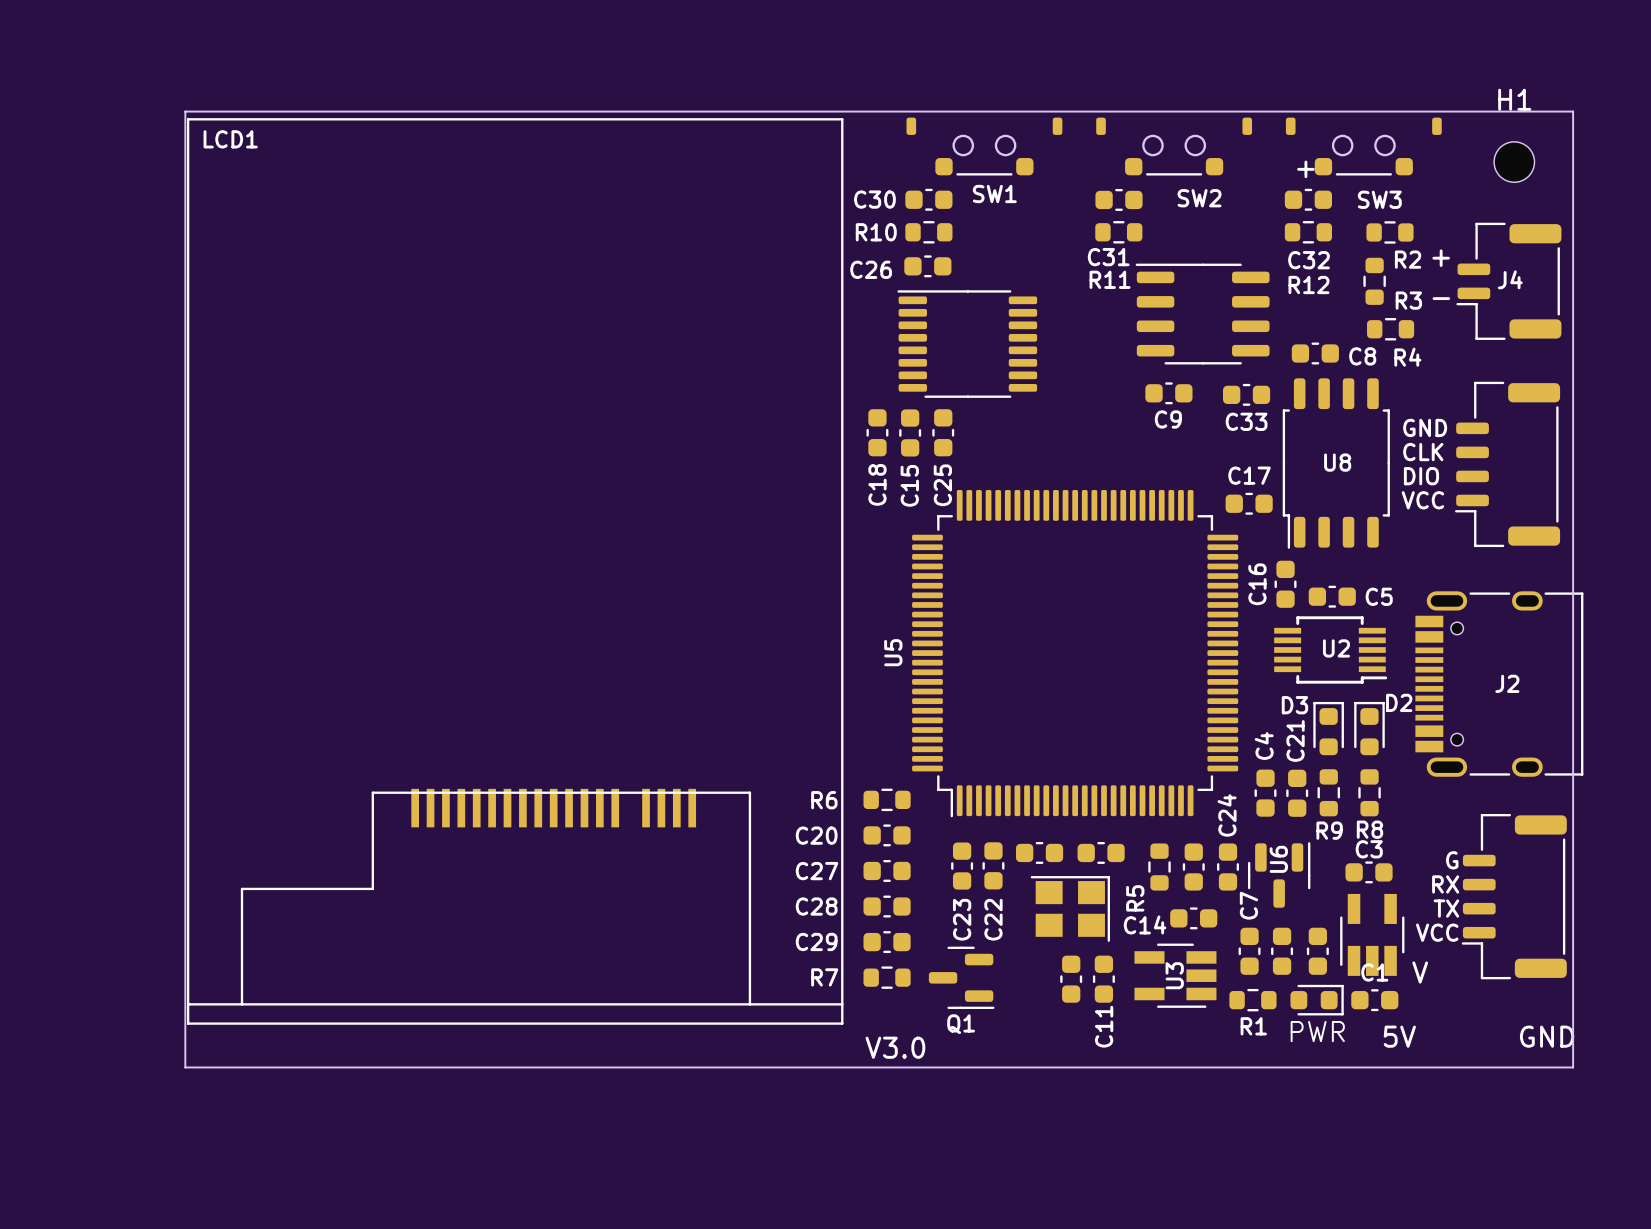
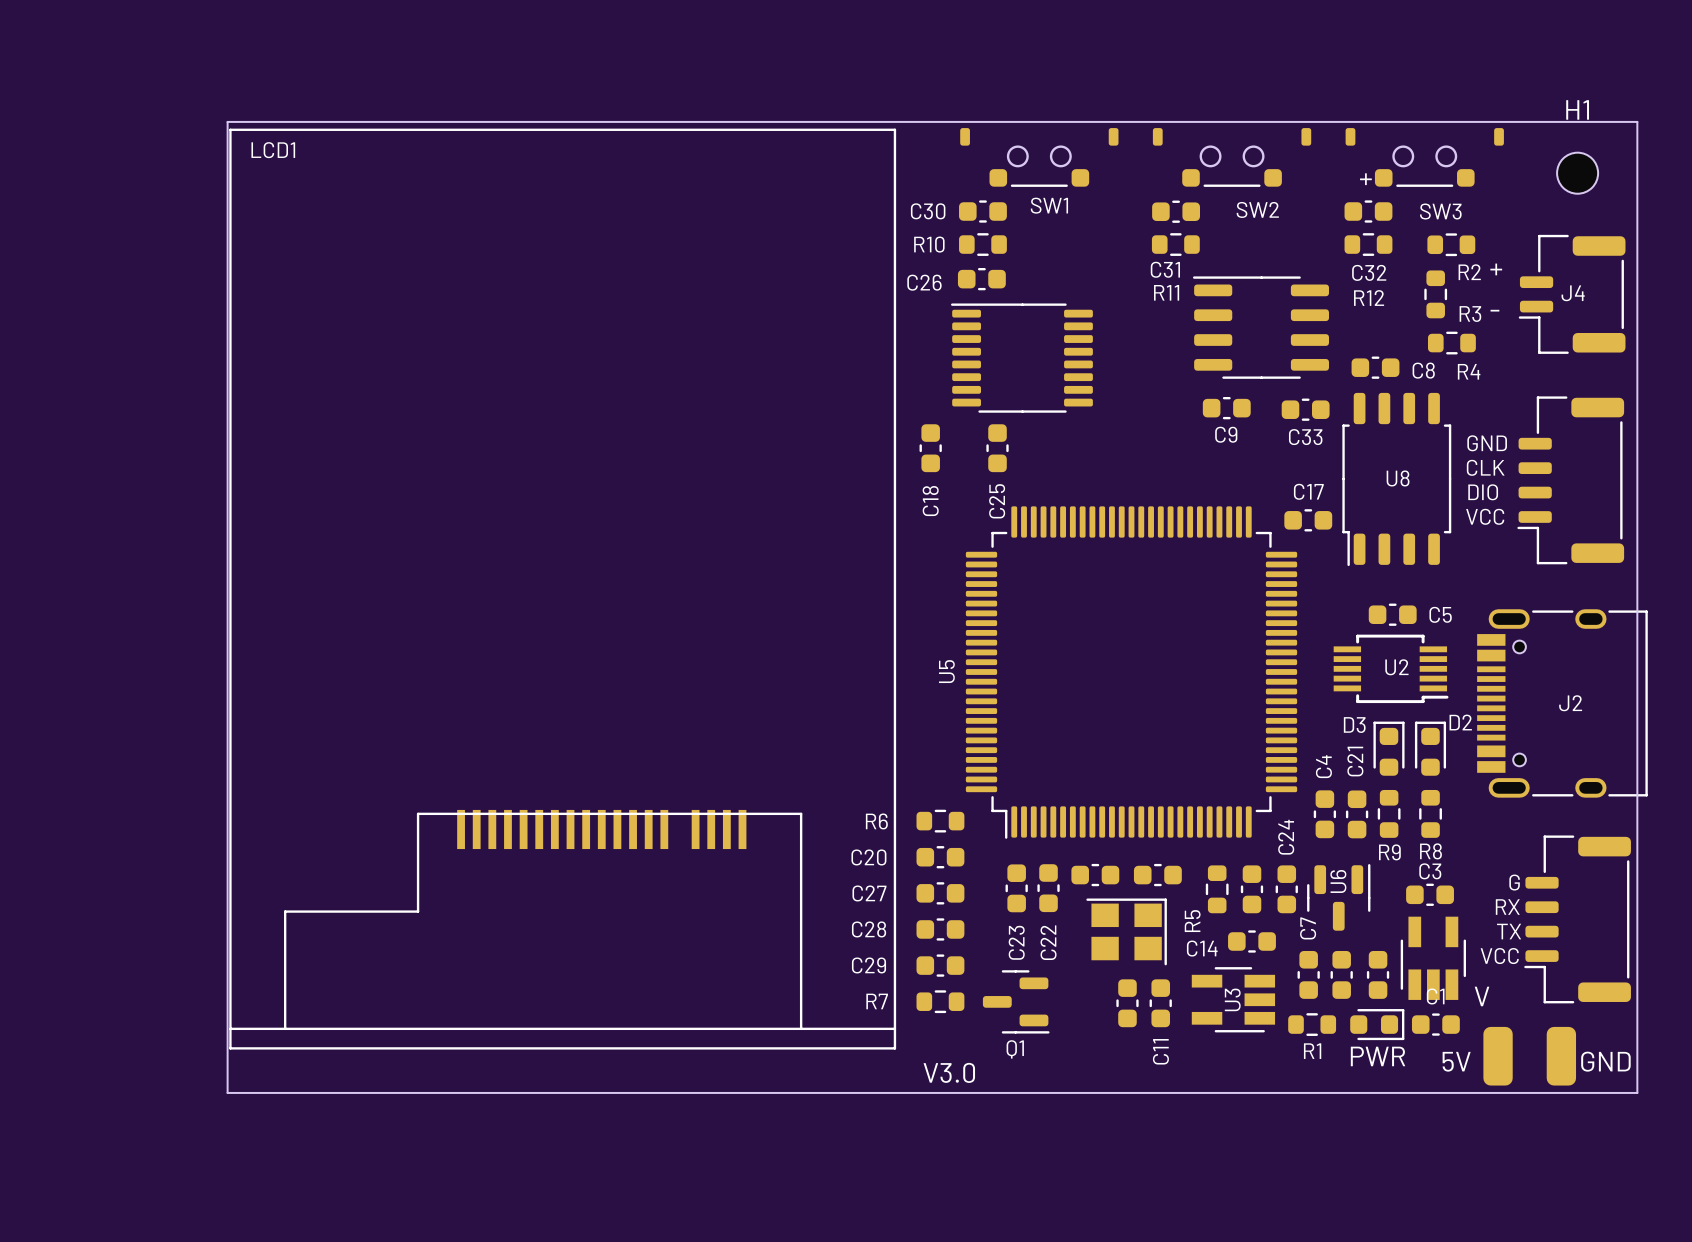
C15: (910, 432) -> none
C16: (1285, 584) -> none
part: none -> (1498, 1056)
part: none -> (1561, 1056)

